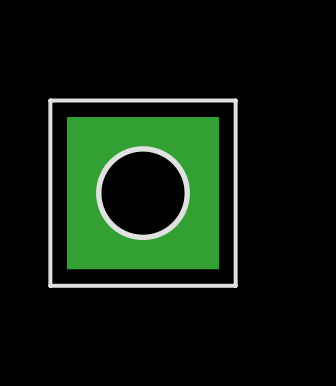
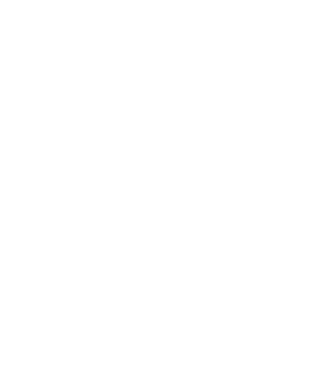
part: (143, 193) -> none

